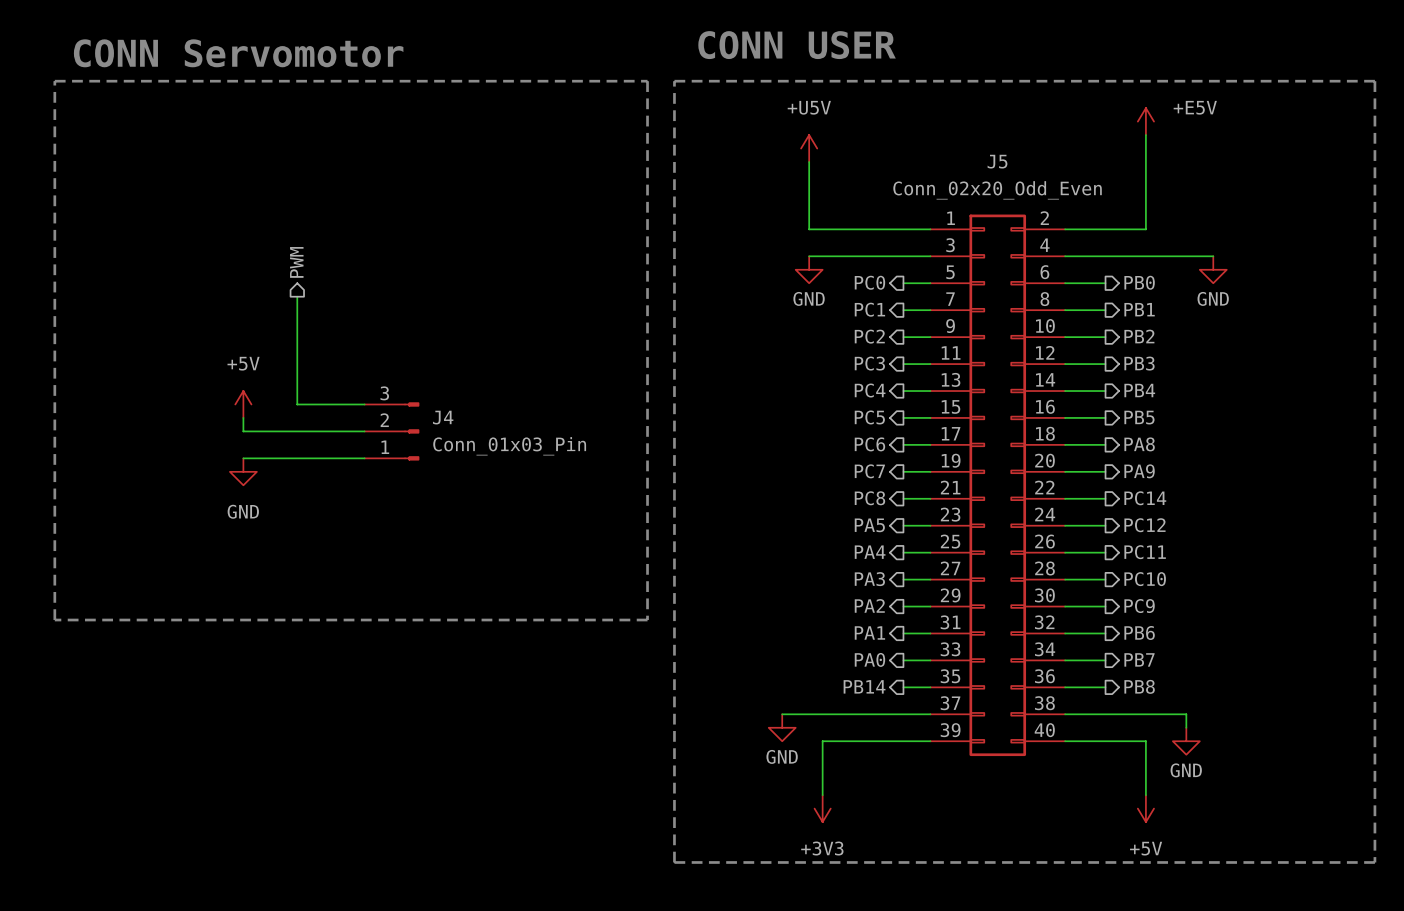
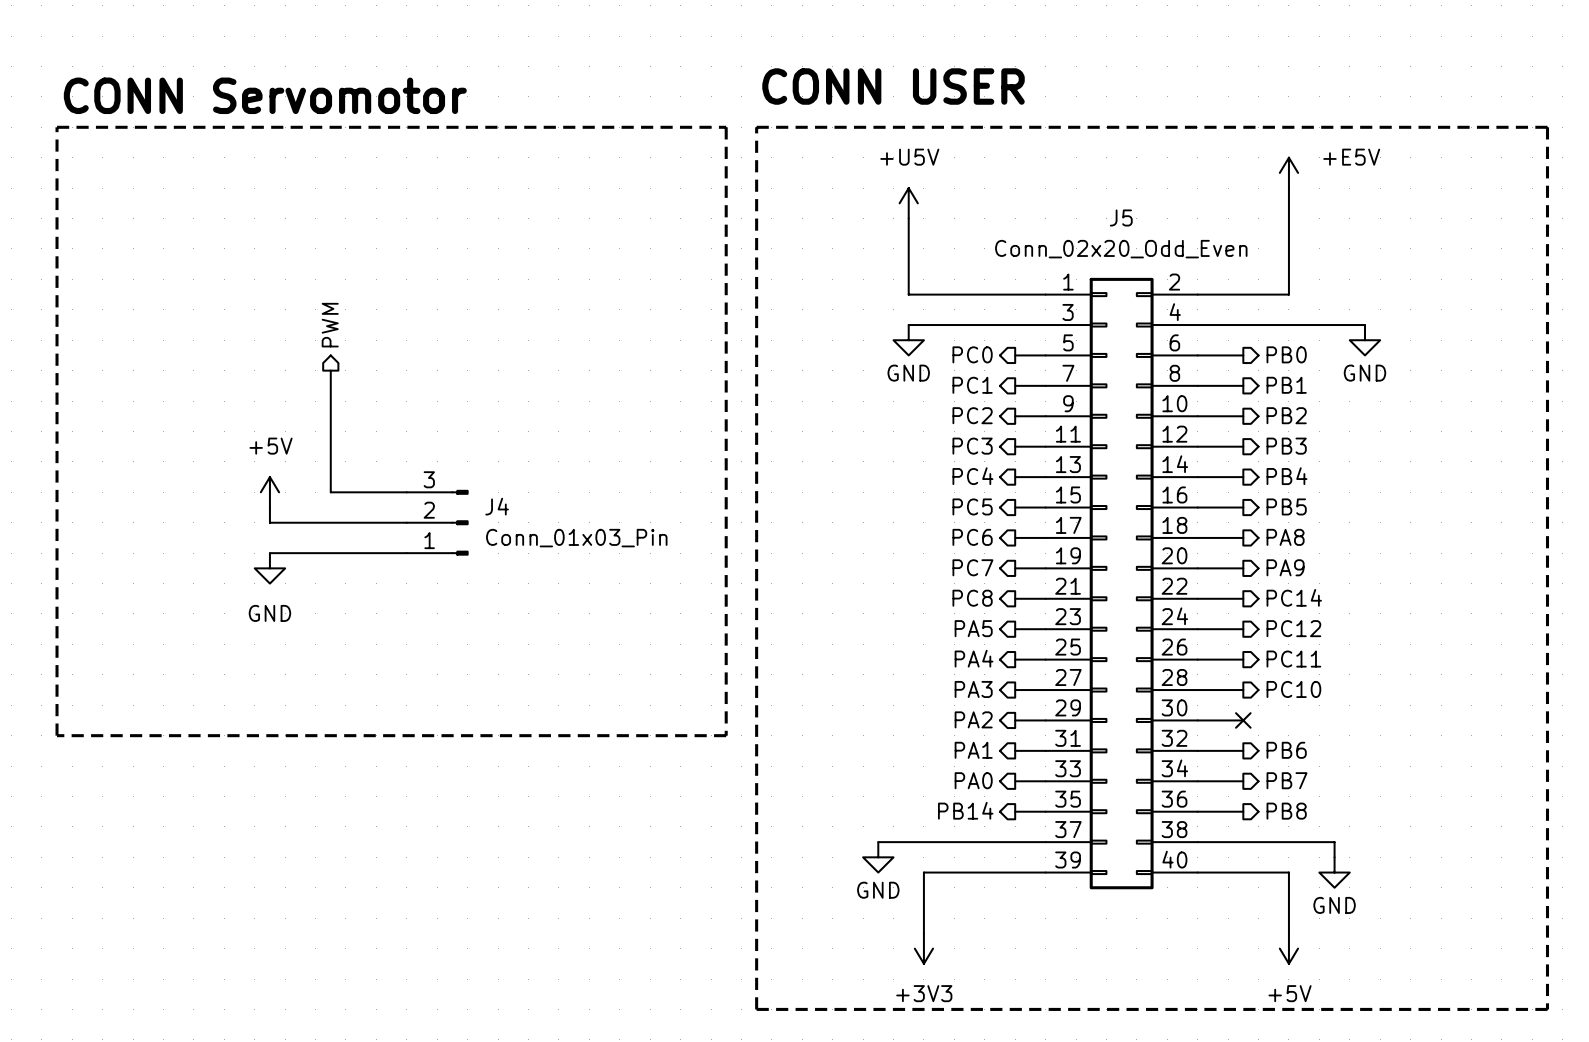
no-connect mark: none -> (1243, 720)
hierarchical label: PC9 (1139, 606) -> none

